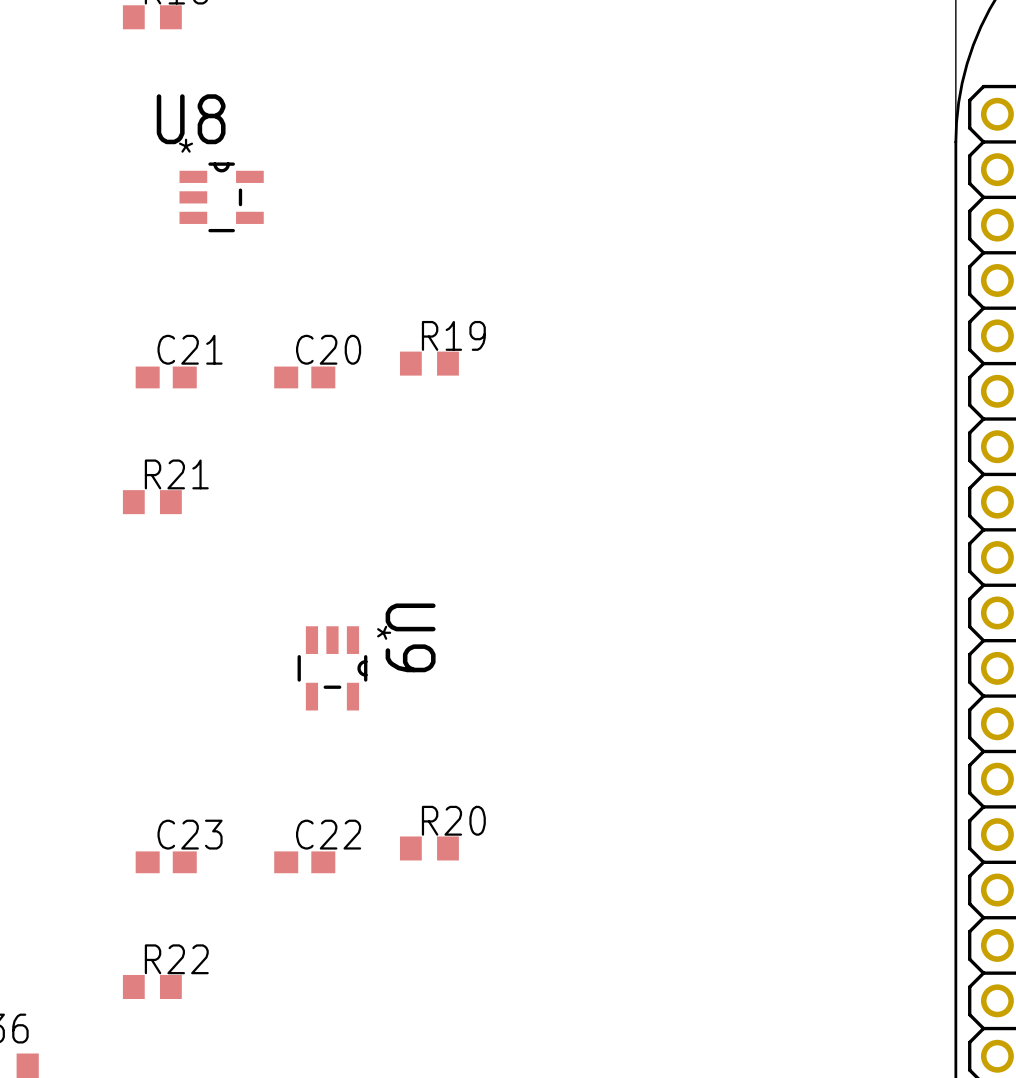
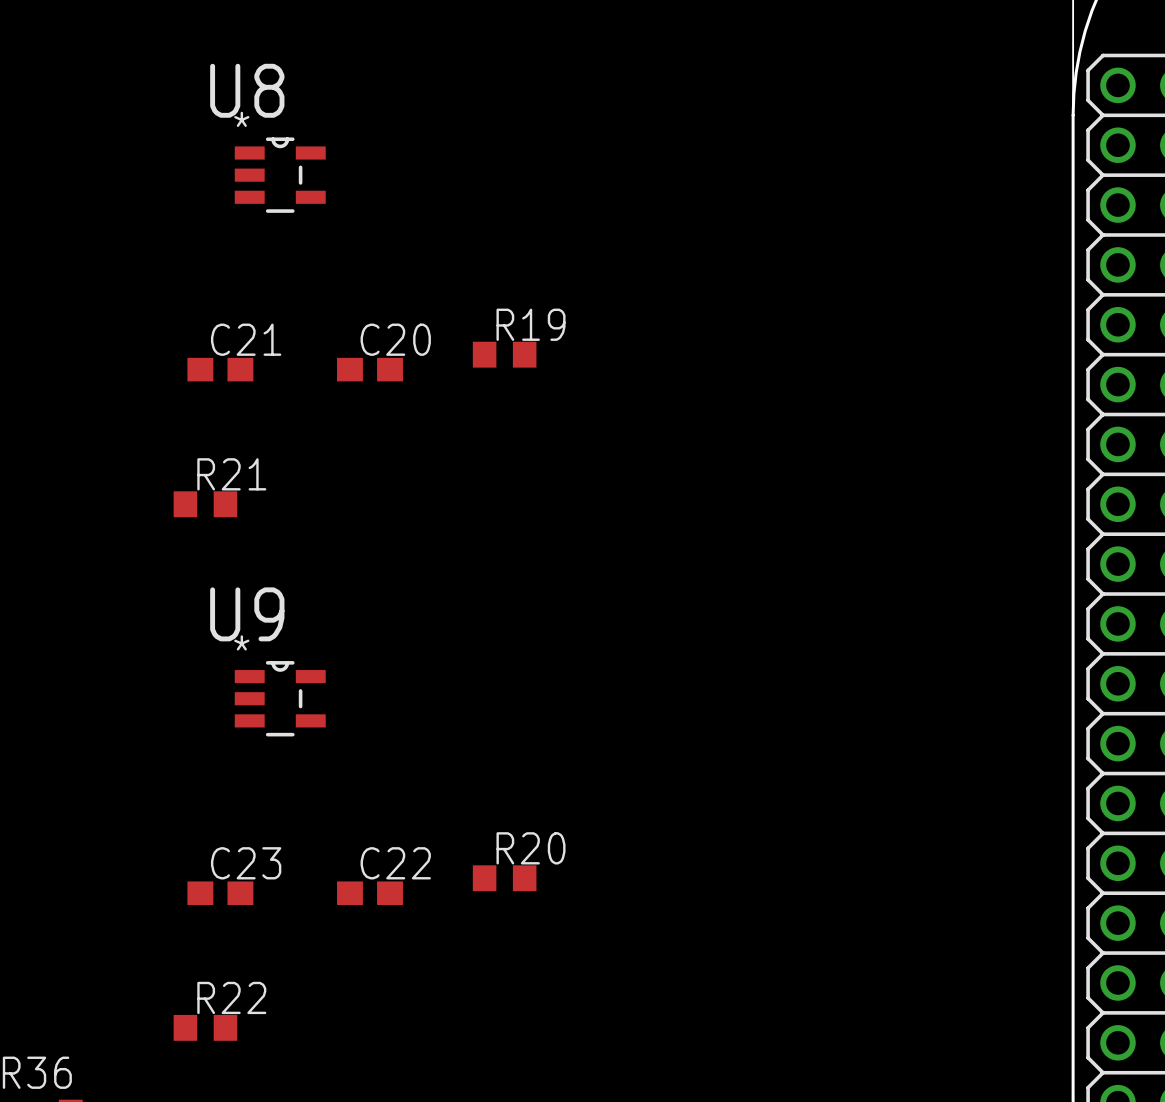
U9 rotation: 0° (332, 668) -> 90° counterclockwise (280, 698)
U9 position: (332, 668) -> (280, 698)

